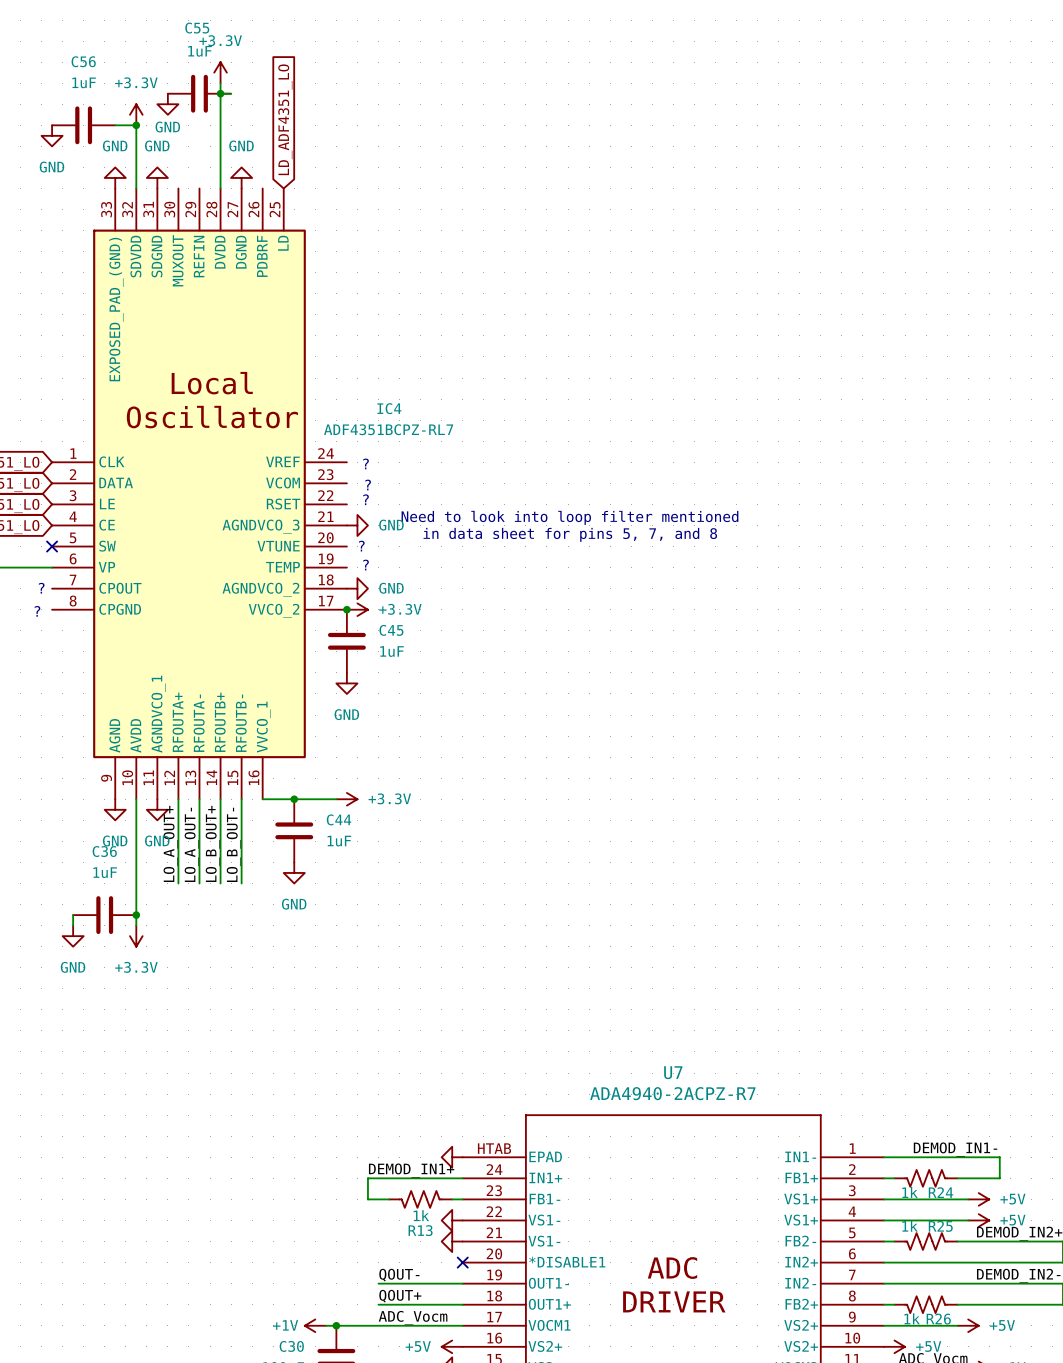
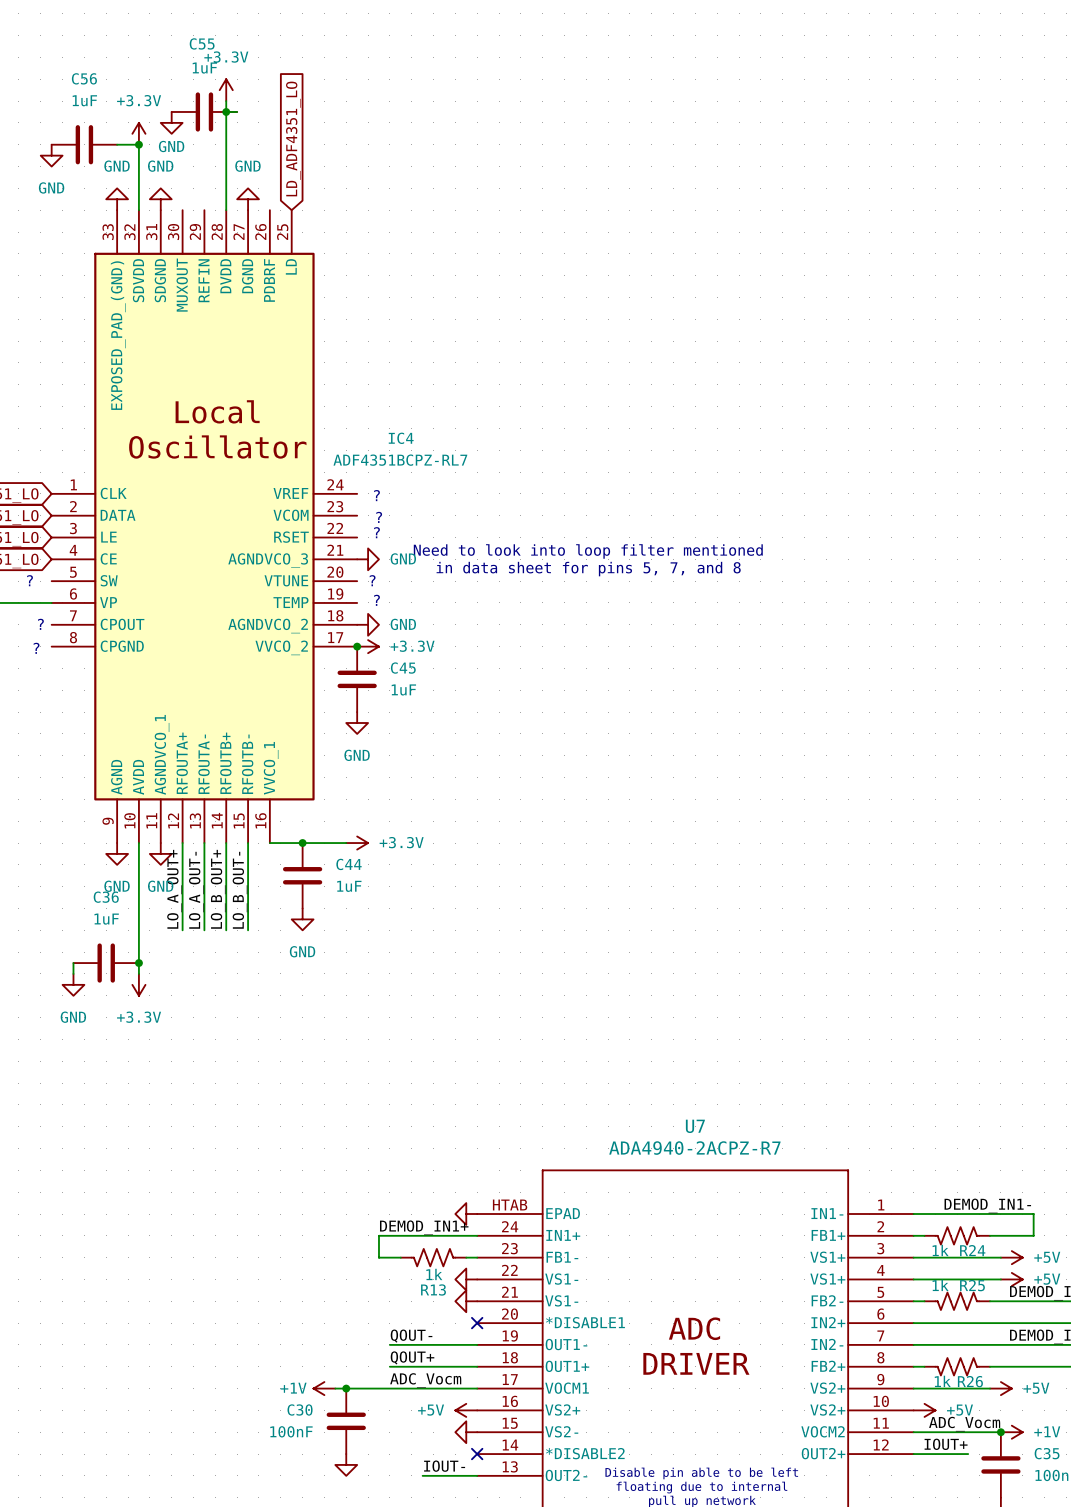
text: none -> ? (30, 580)
no-connect mark: (52, 546) -> none

